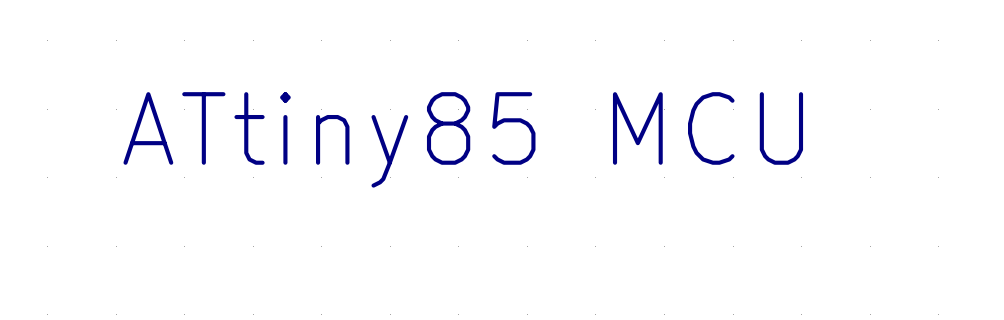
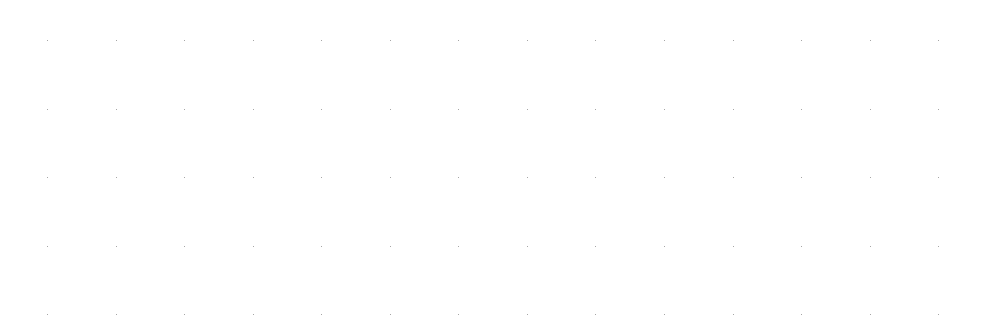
text: ATtiny85 MCU (463, 139) -> none

